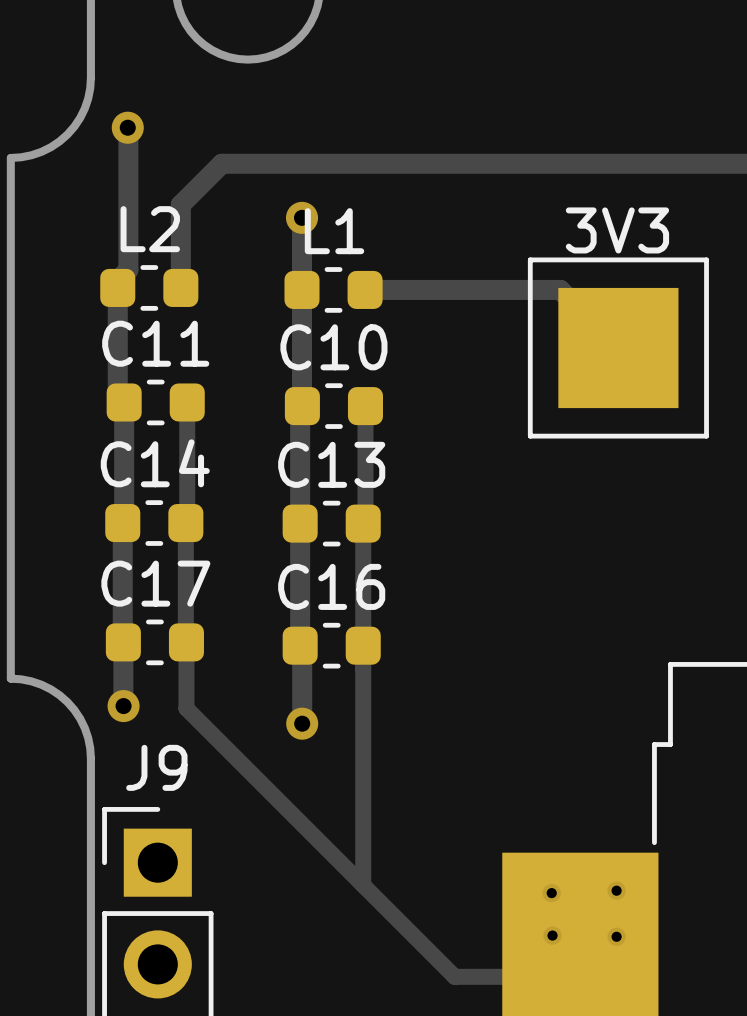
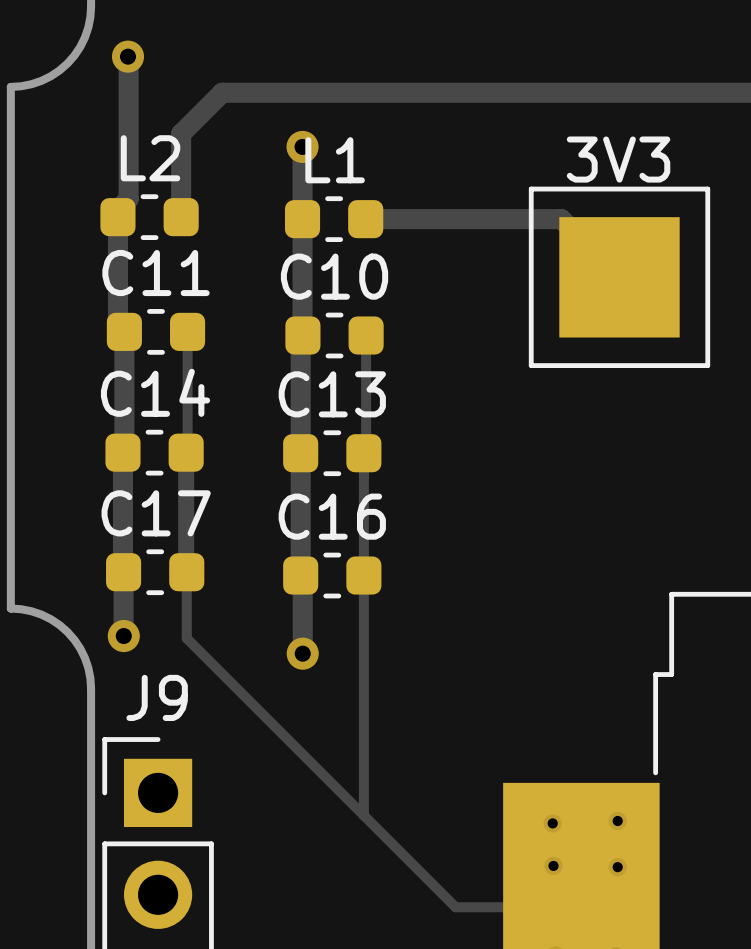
track width: thick (187, 402) (185, 523) -> thin (187, 331) (186, 452)
track width: thick (365, 406) (365, 521) (363, 523) (363, 885) -> thin (366, 335) (366, 450) (363, 453) (363, 815)
track width: thick (185, 641) (186, 708) (454, 976) (580, 976) -> thin (186, 571) (186, 638) (455, 907) (581, 907)

